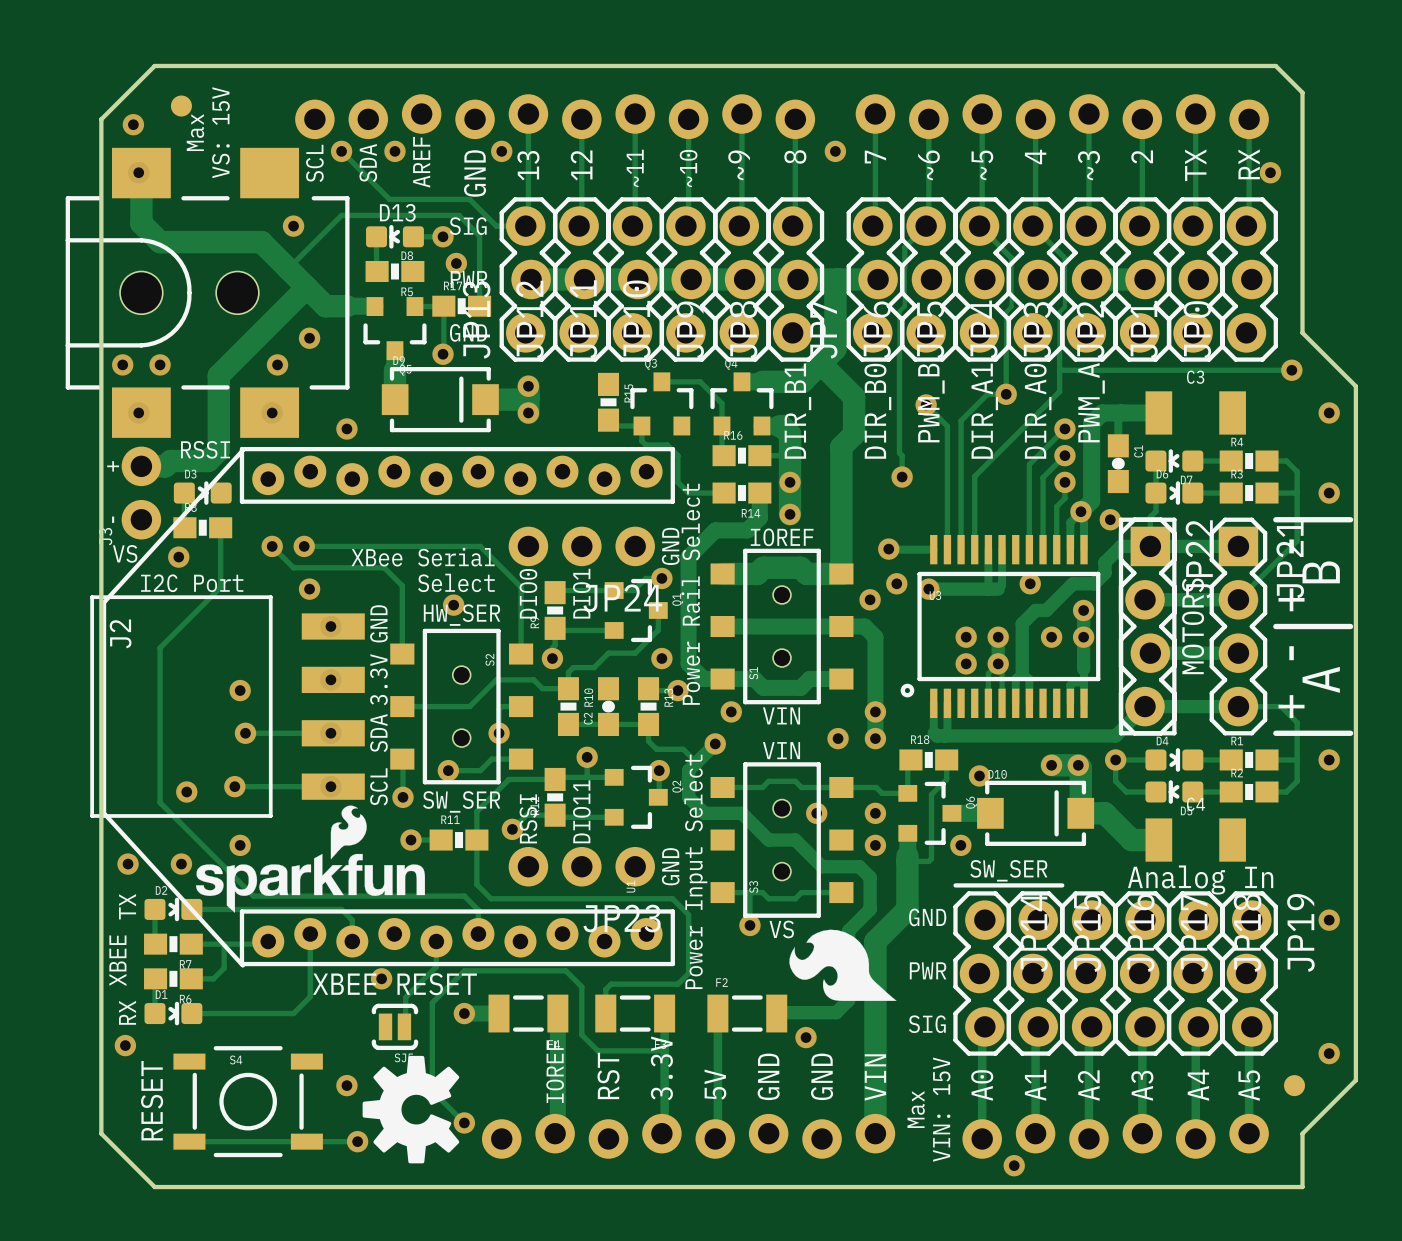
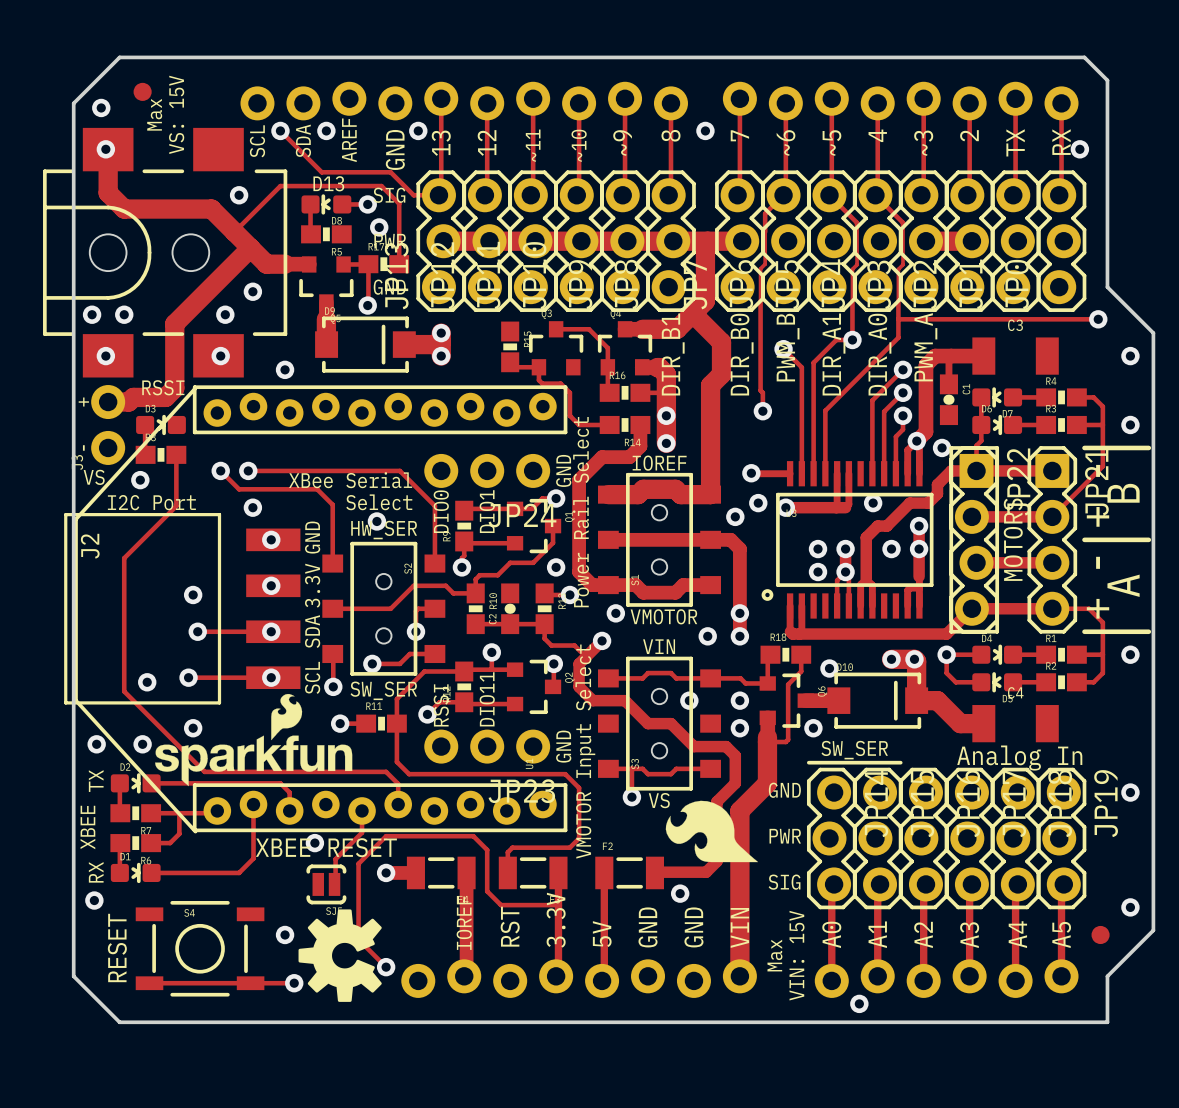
text: VIN (781, 715) -> VMOTOR (663, 616)
text: Power Input Select (695, 871) -> VMOTOR Input Select (585, 751)

